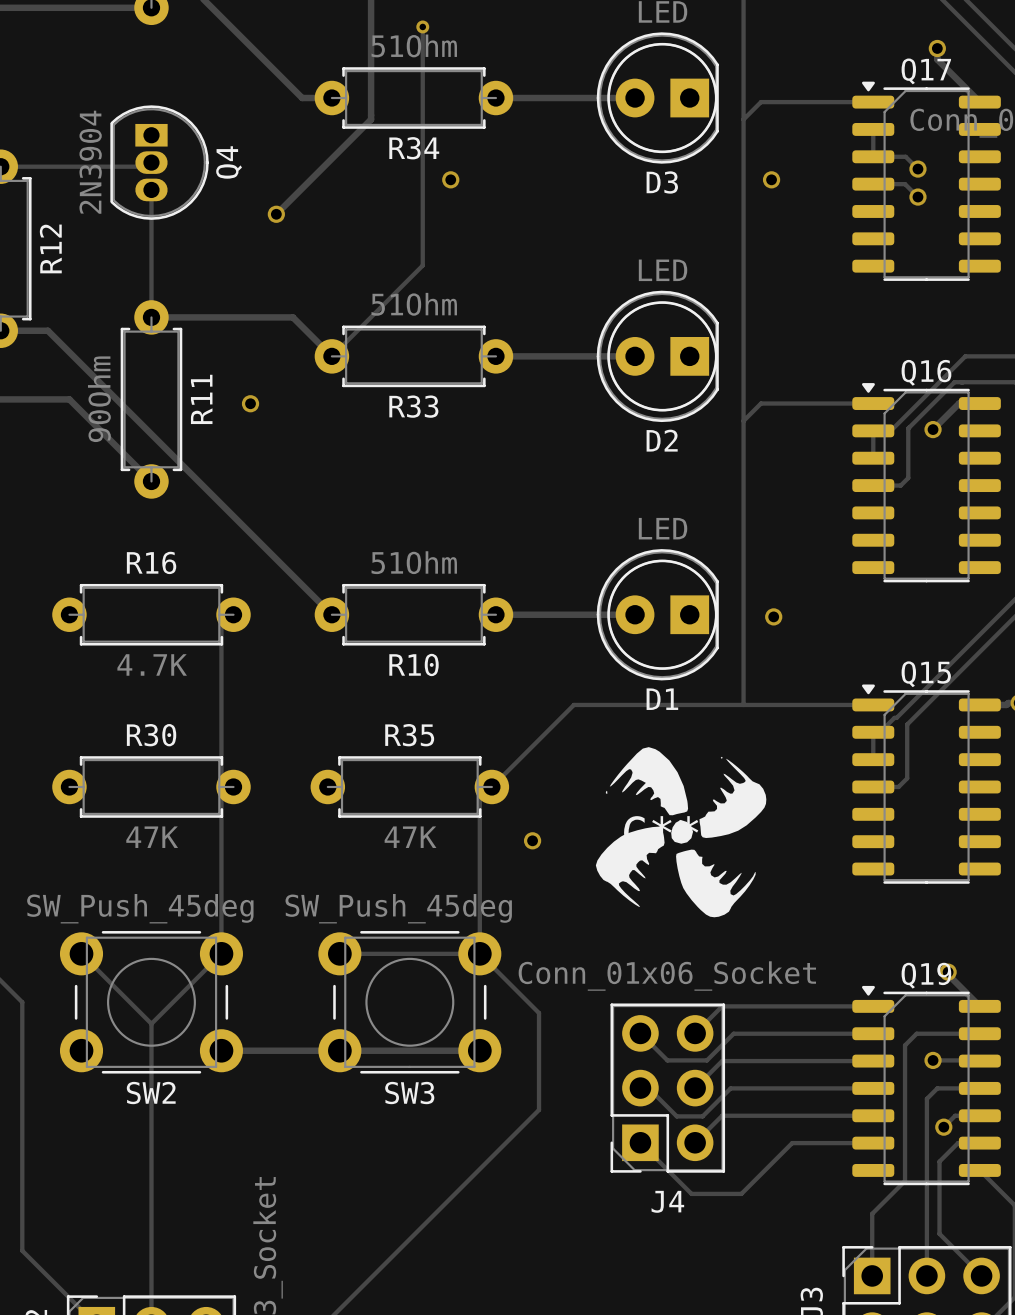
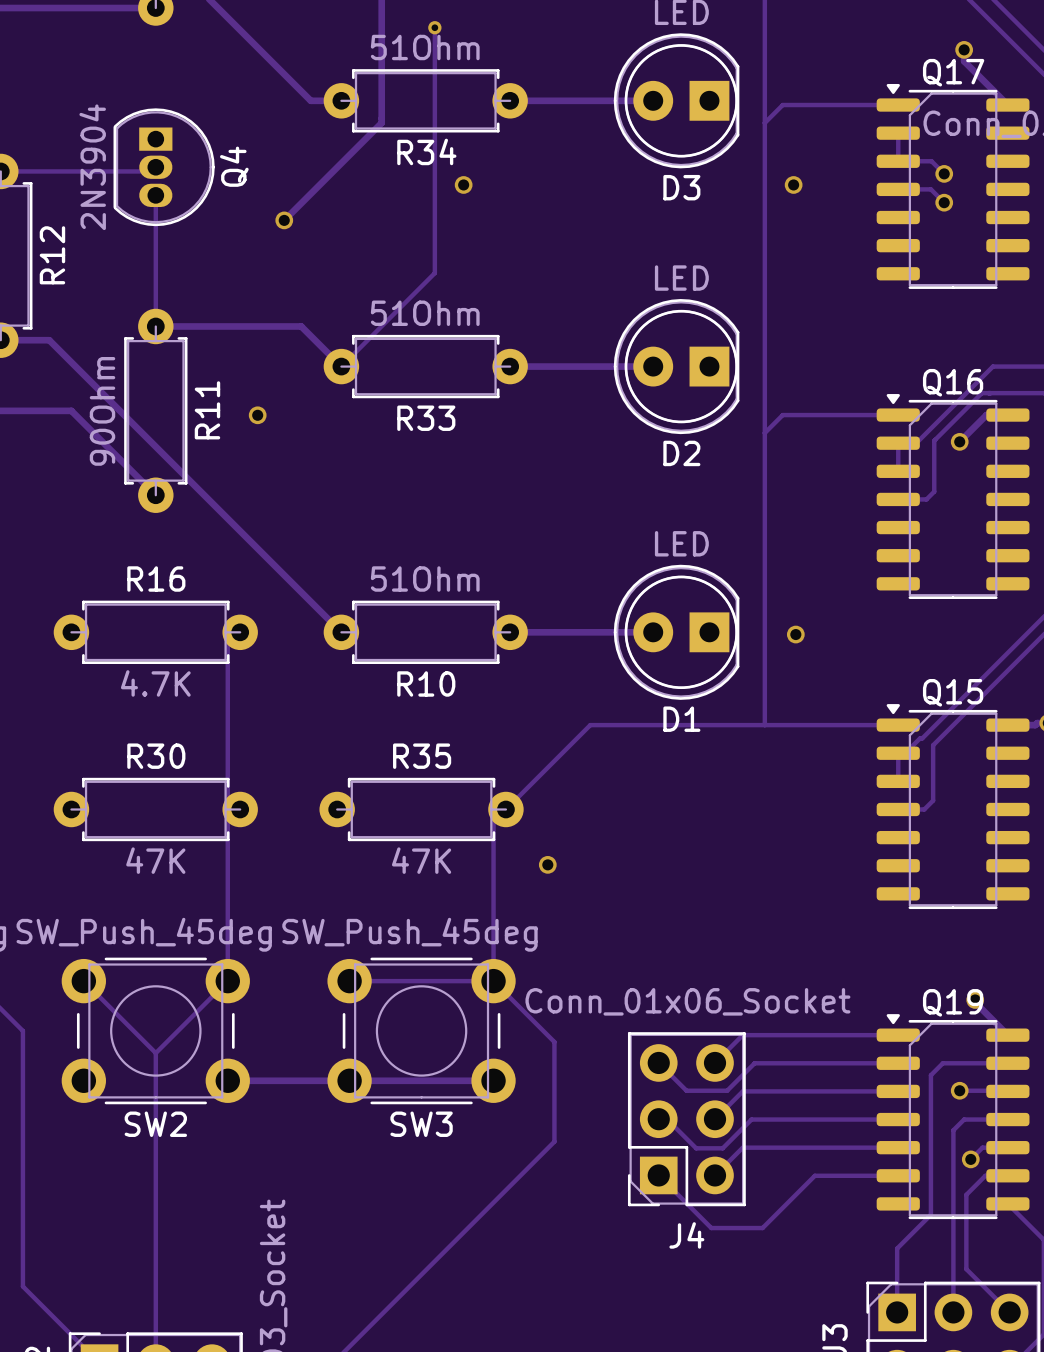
part: (681, 832) -> none

